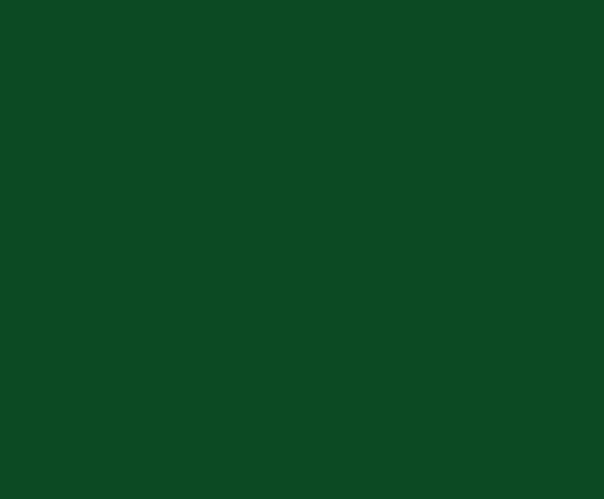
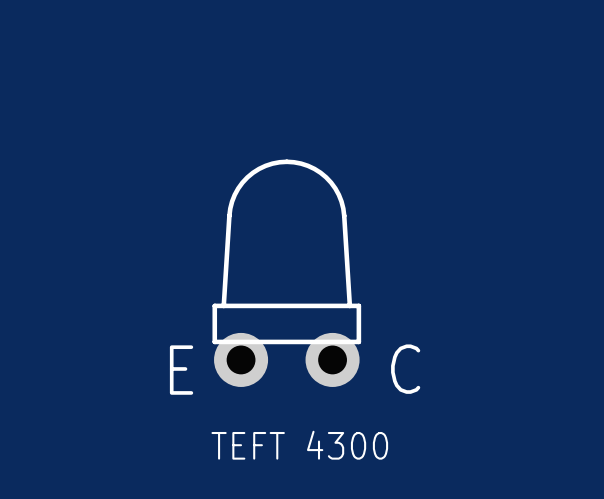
part: none -> (286, 273)

